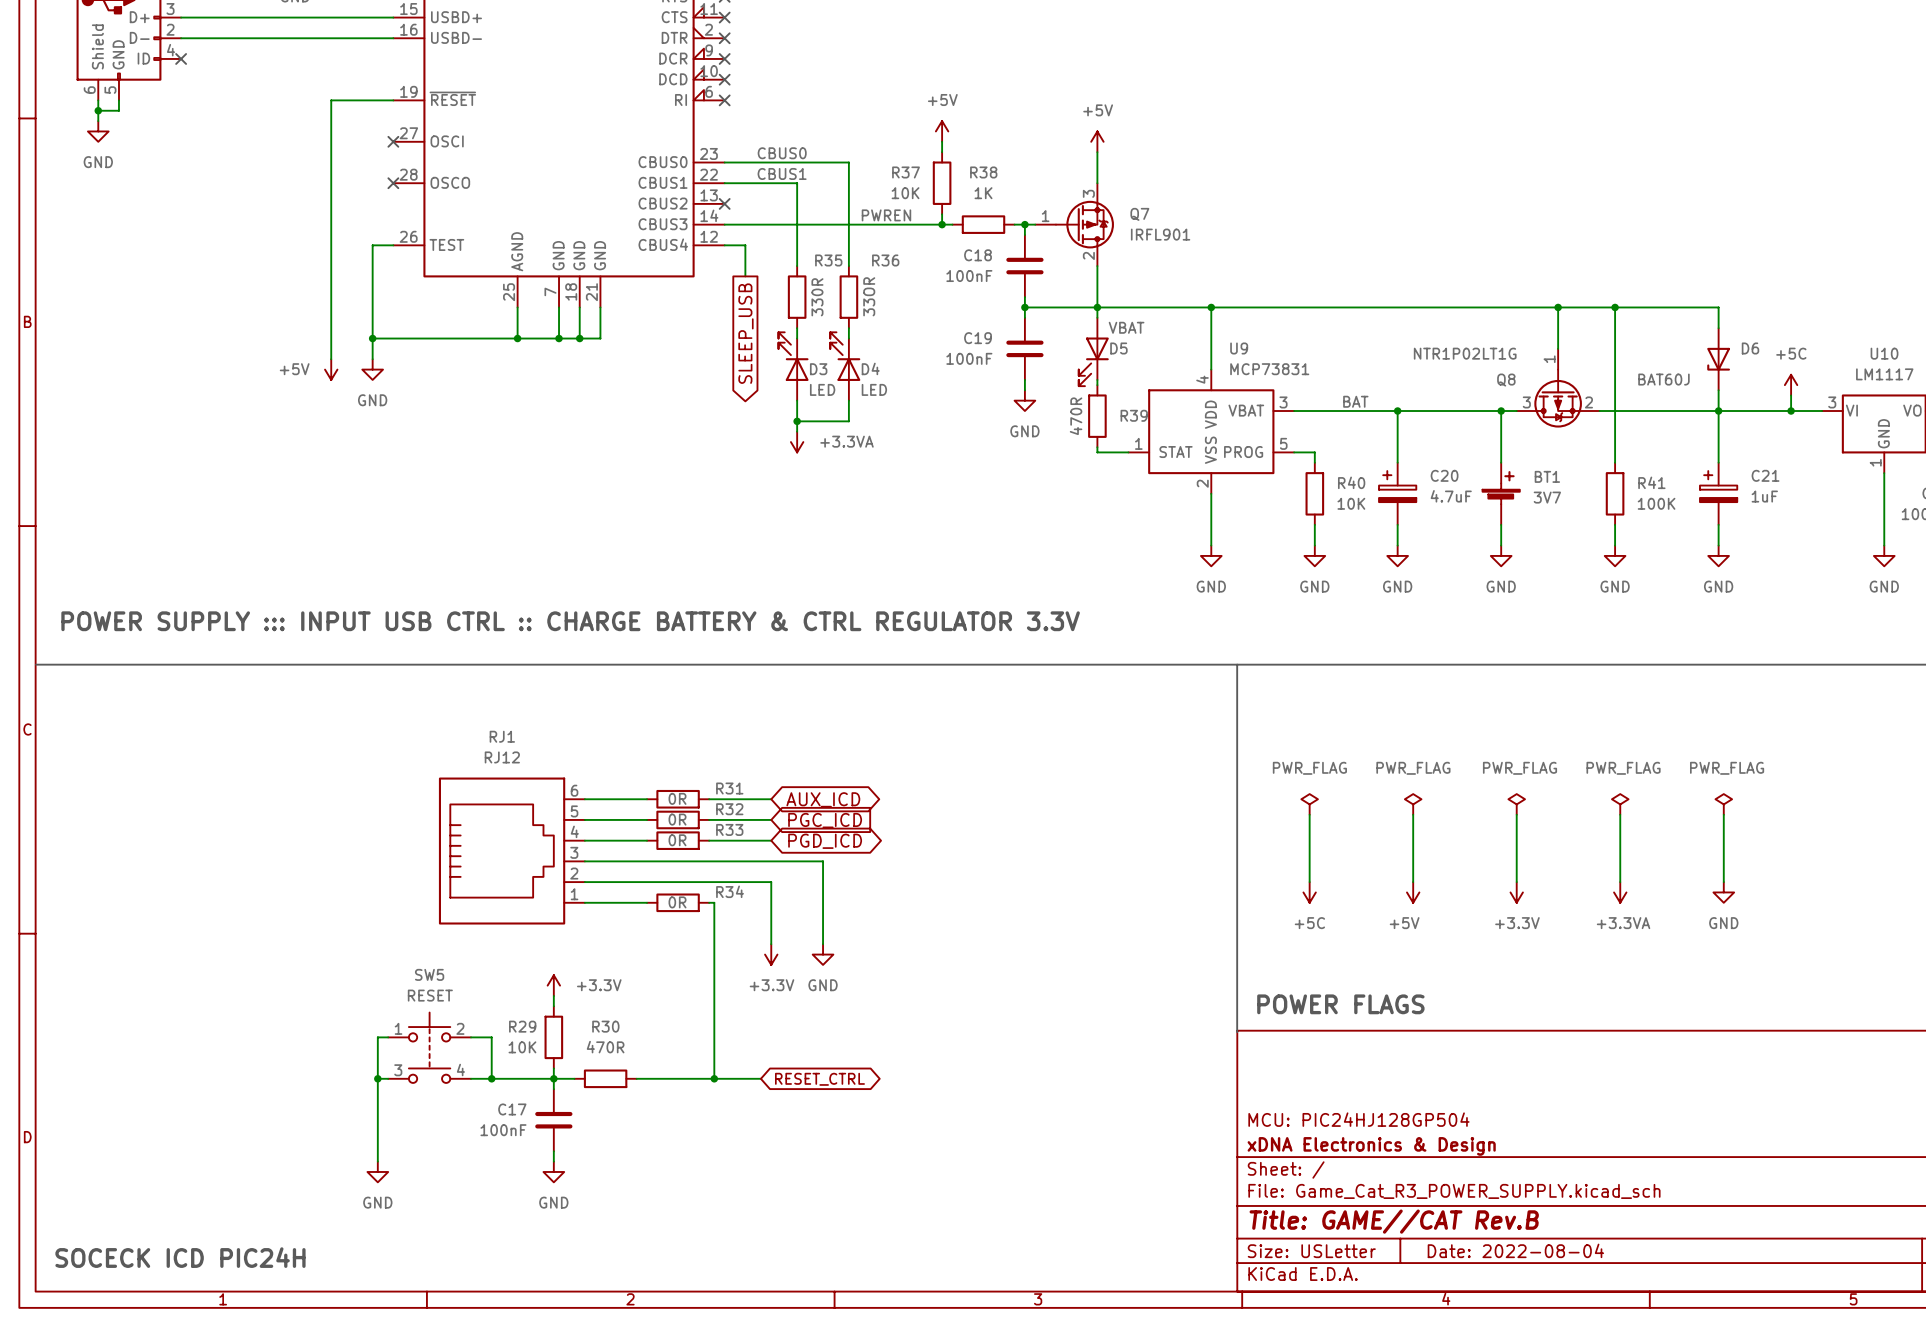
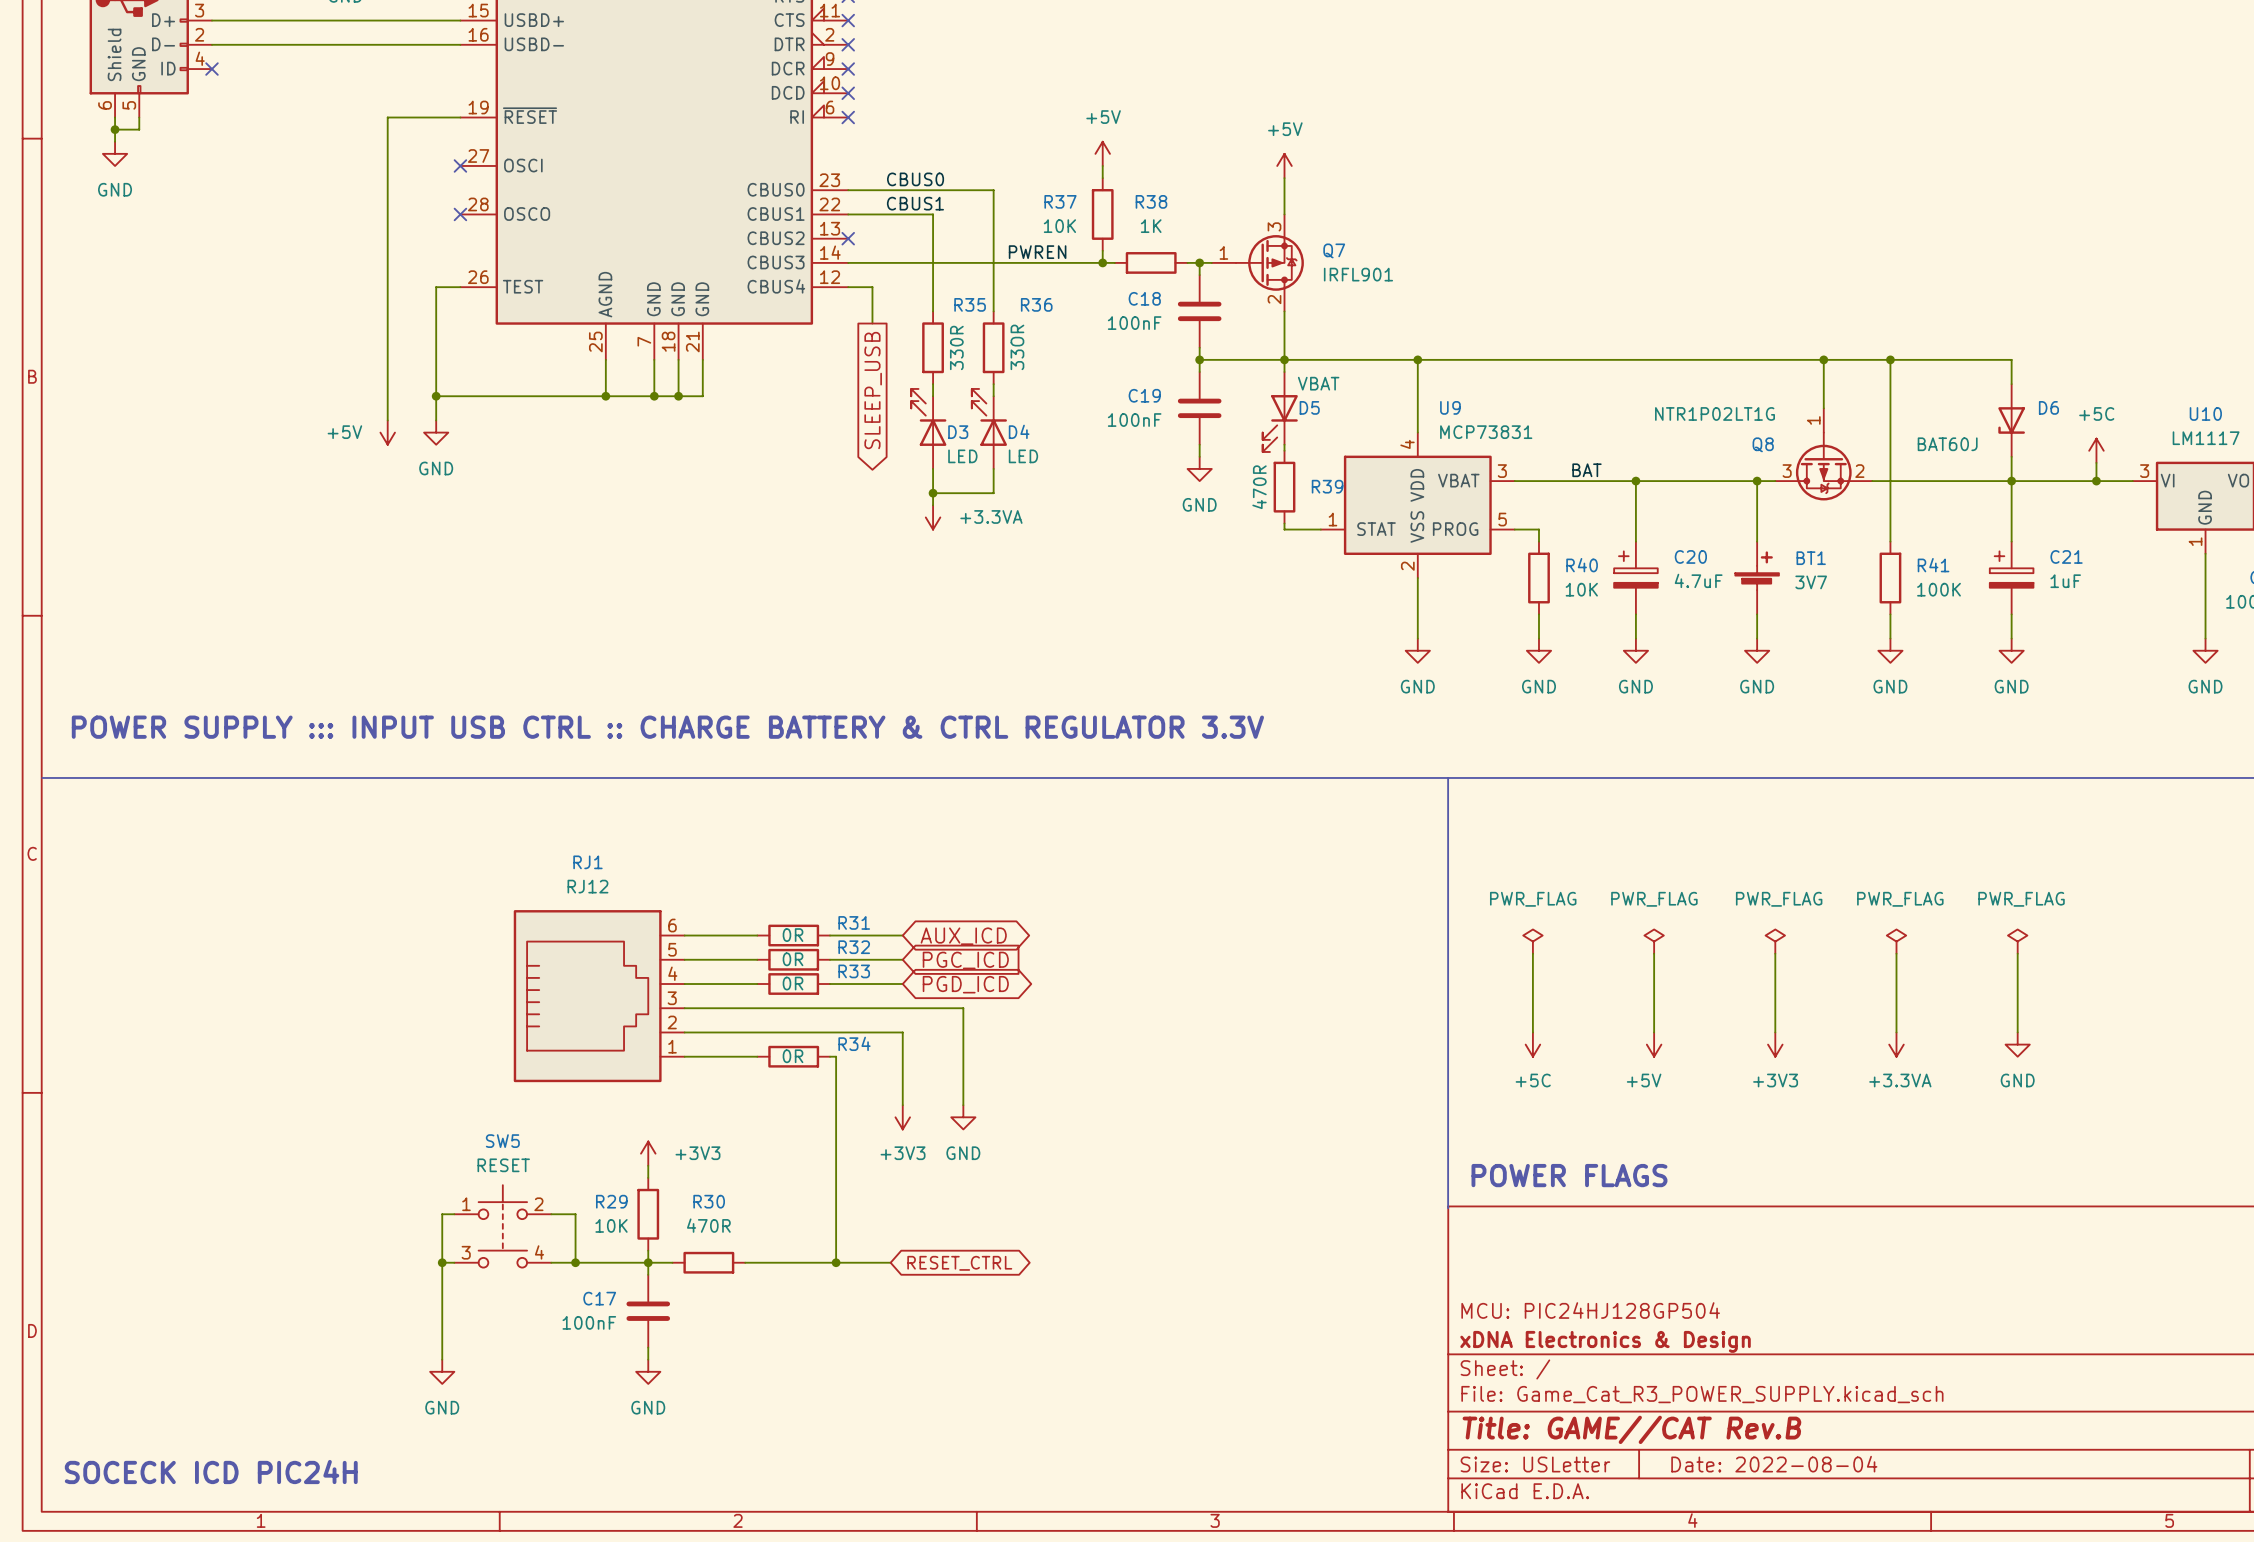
power symbol: +3.3V (1516, 892) -> +3V3 (1775, 1044)
power symbol: +3.3V (771, 954) -> +3V3 (902, 1117)
power symbol: +3.3V (553, 985) -> +3V3 (648, 1153)

